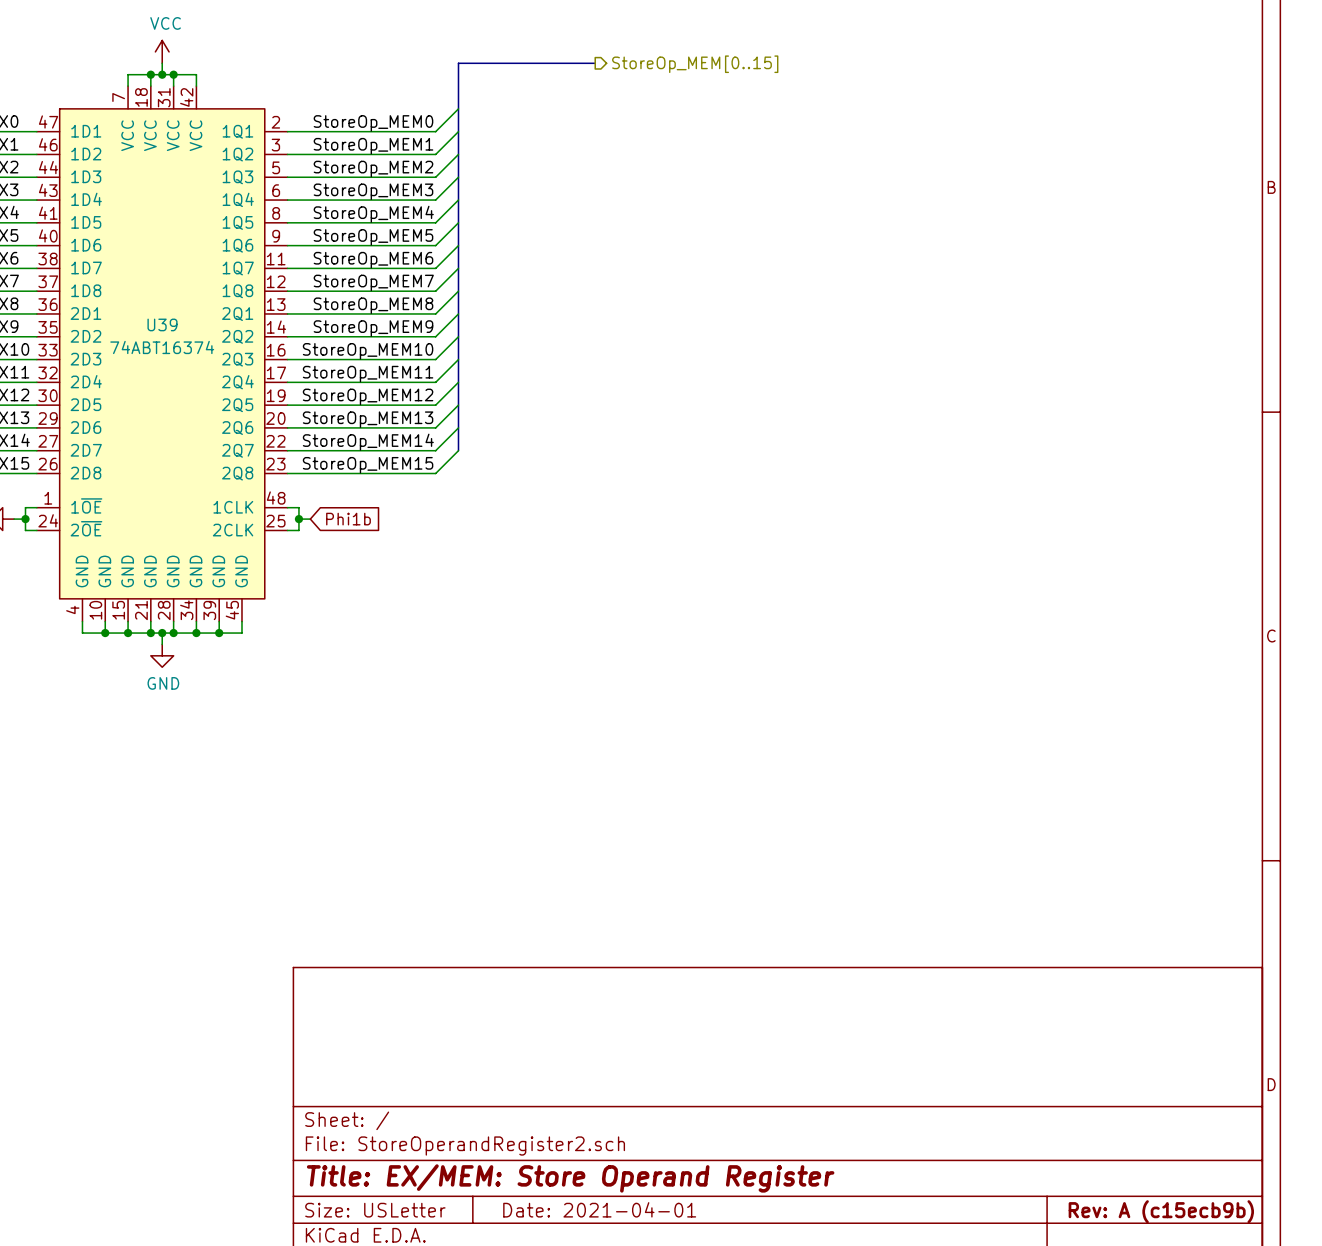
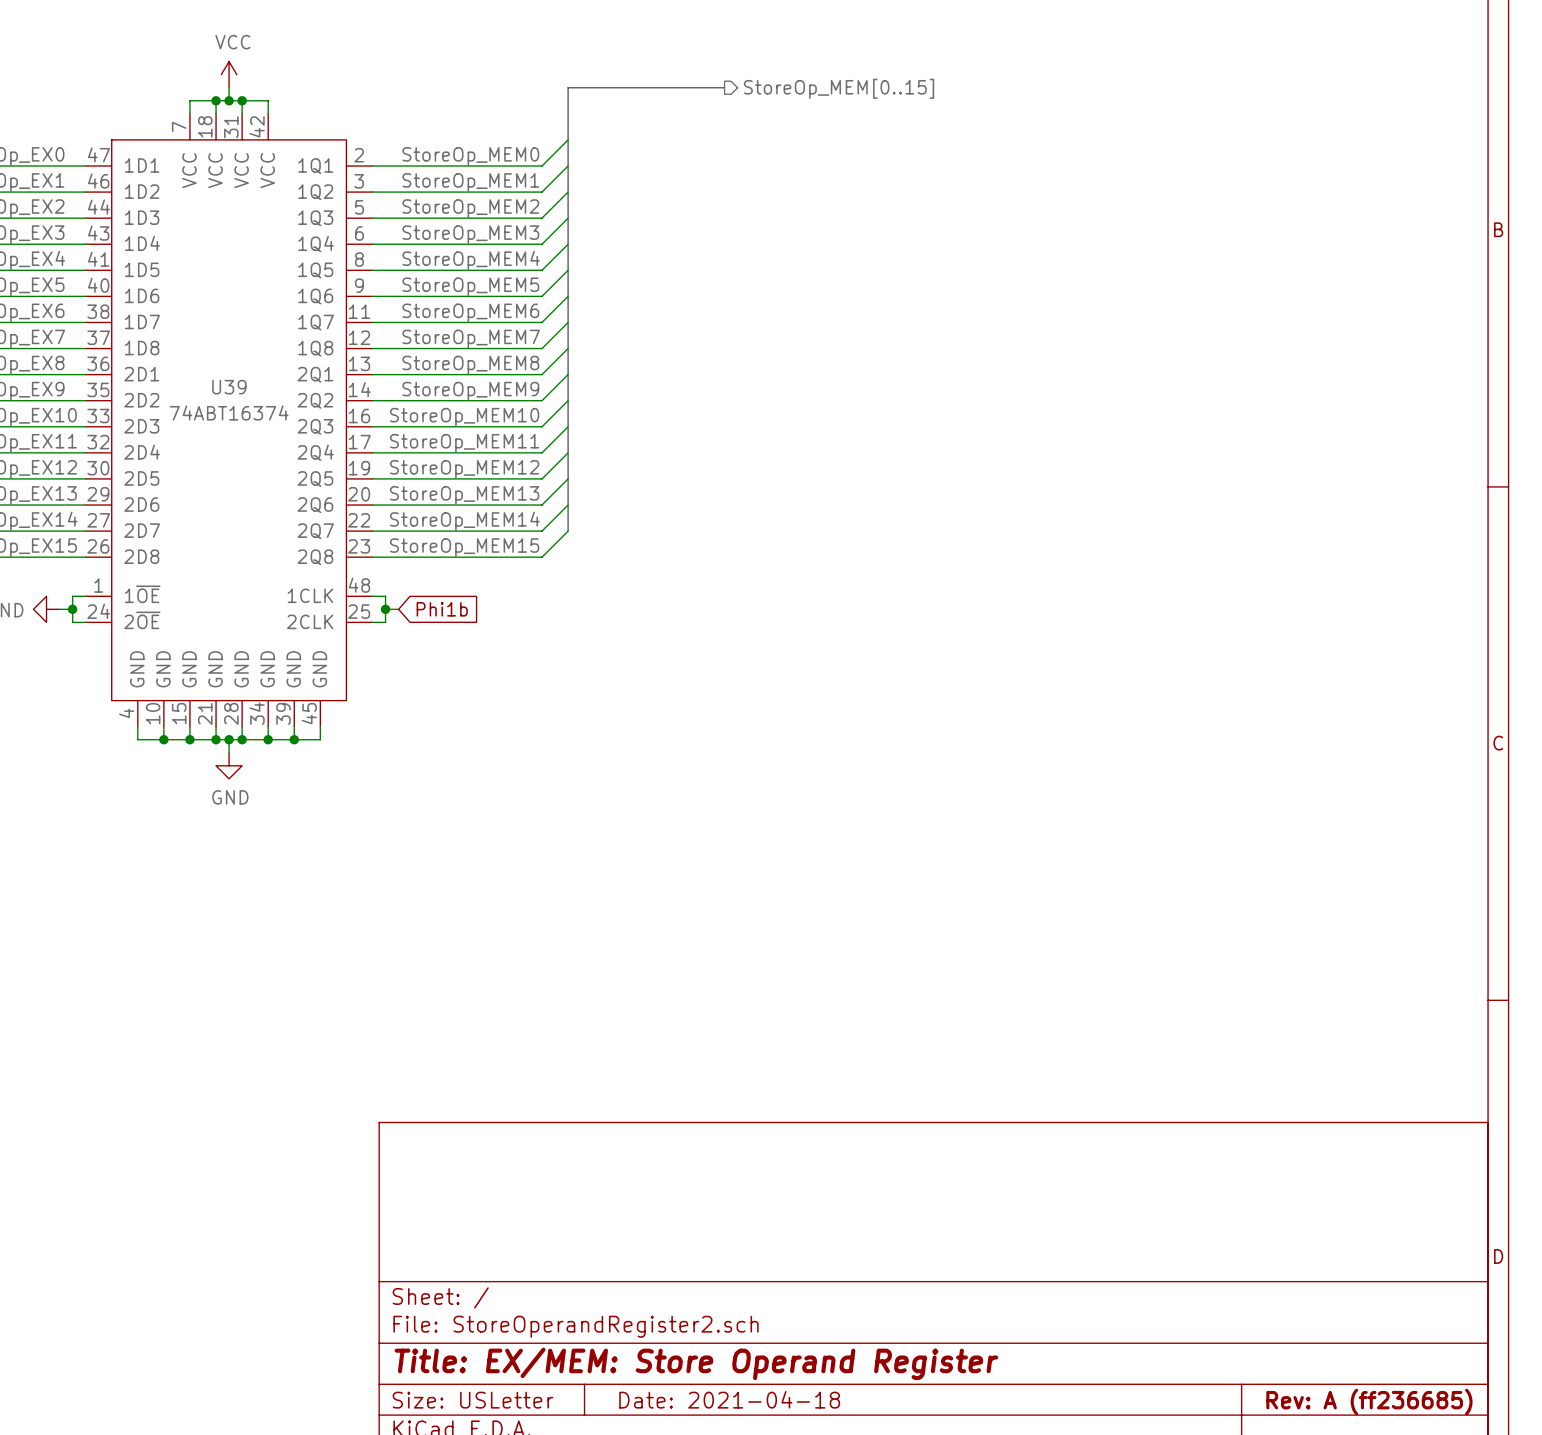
title block: Date: 2021-04-01 (599, 1209) -> Date: 2021-04-18 (729, 1399)
title block: Rev: A (c15ecb9b) (1161, 1211) -> Rev: A (ff236685) (1369, 1401)

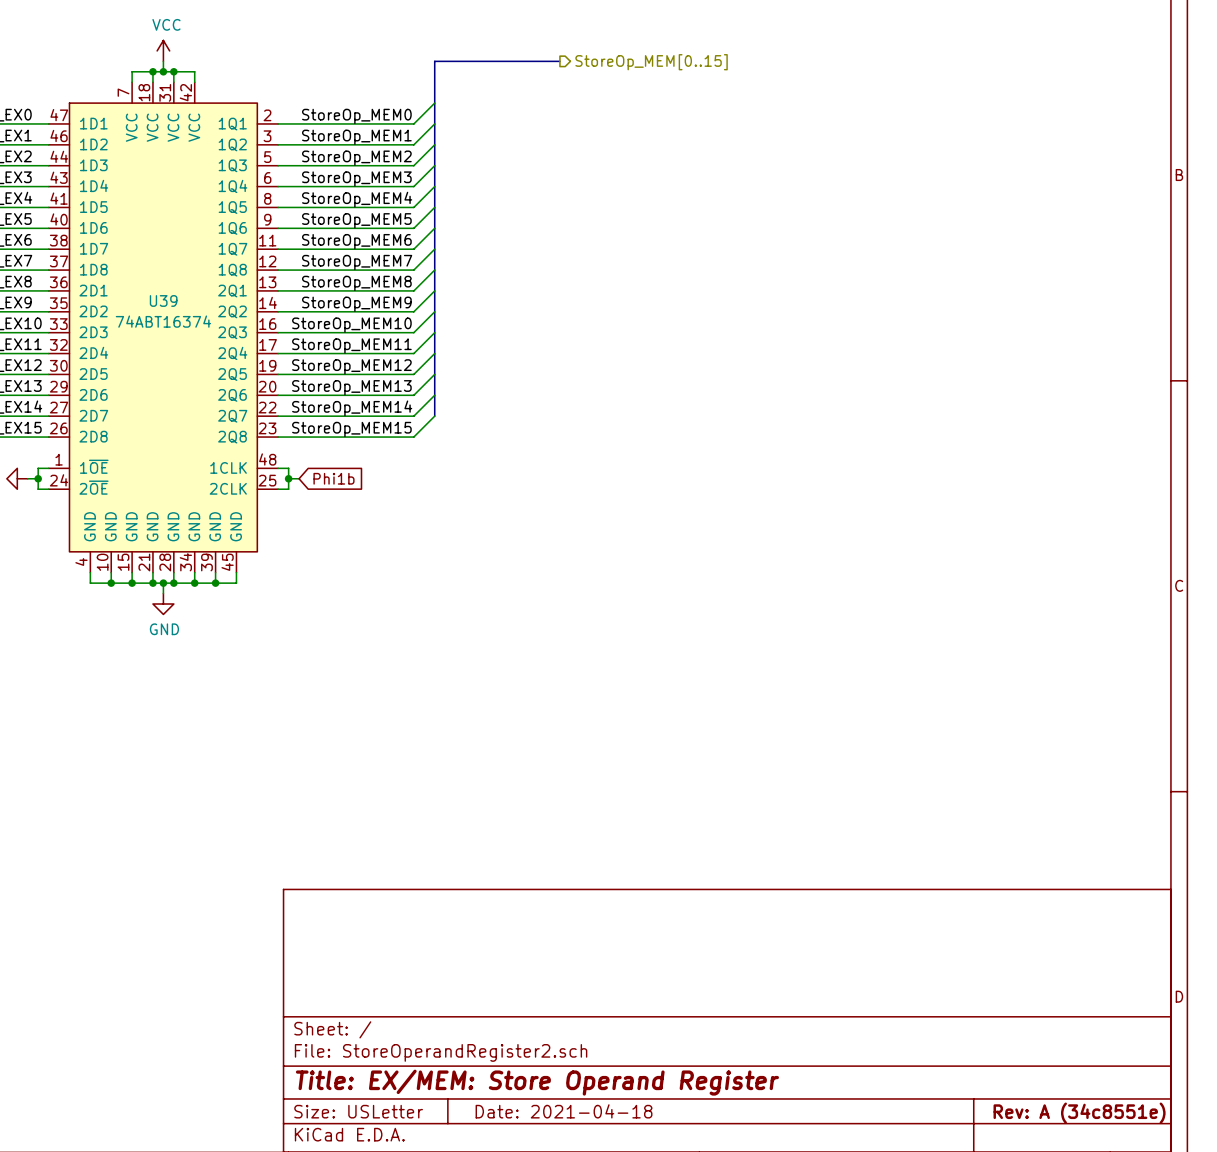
title block: Rev: A (ff236685) (1369, 1401) -> Rev: A (34c8551e) (1079, 1113)

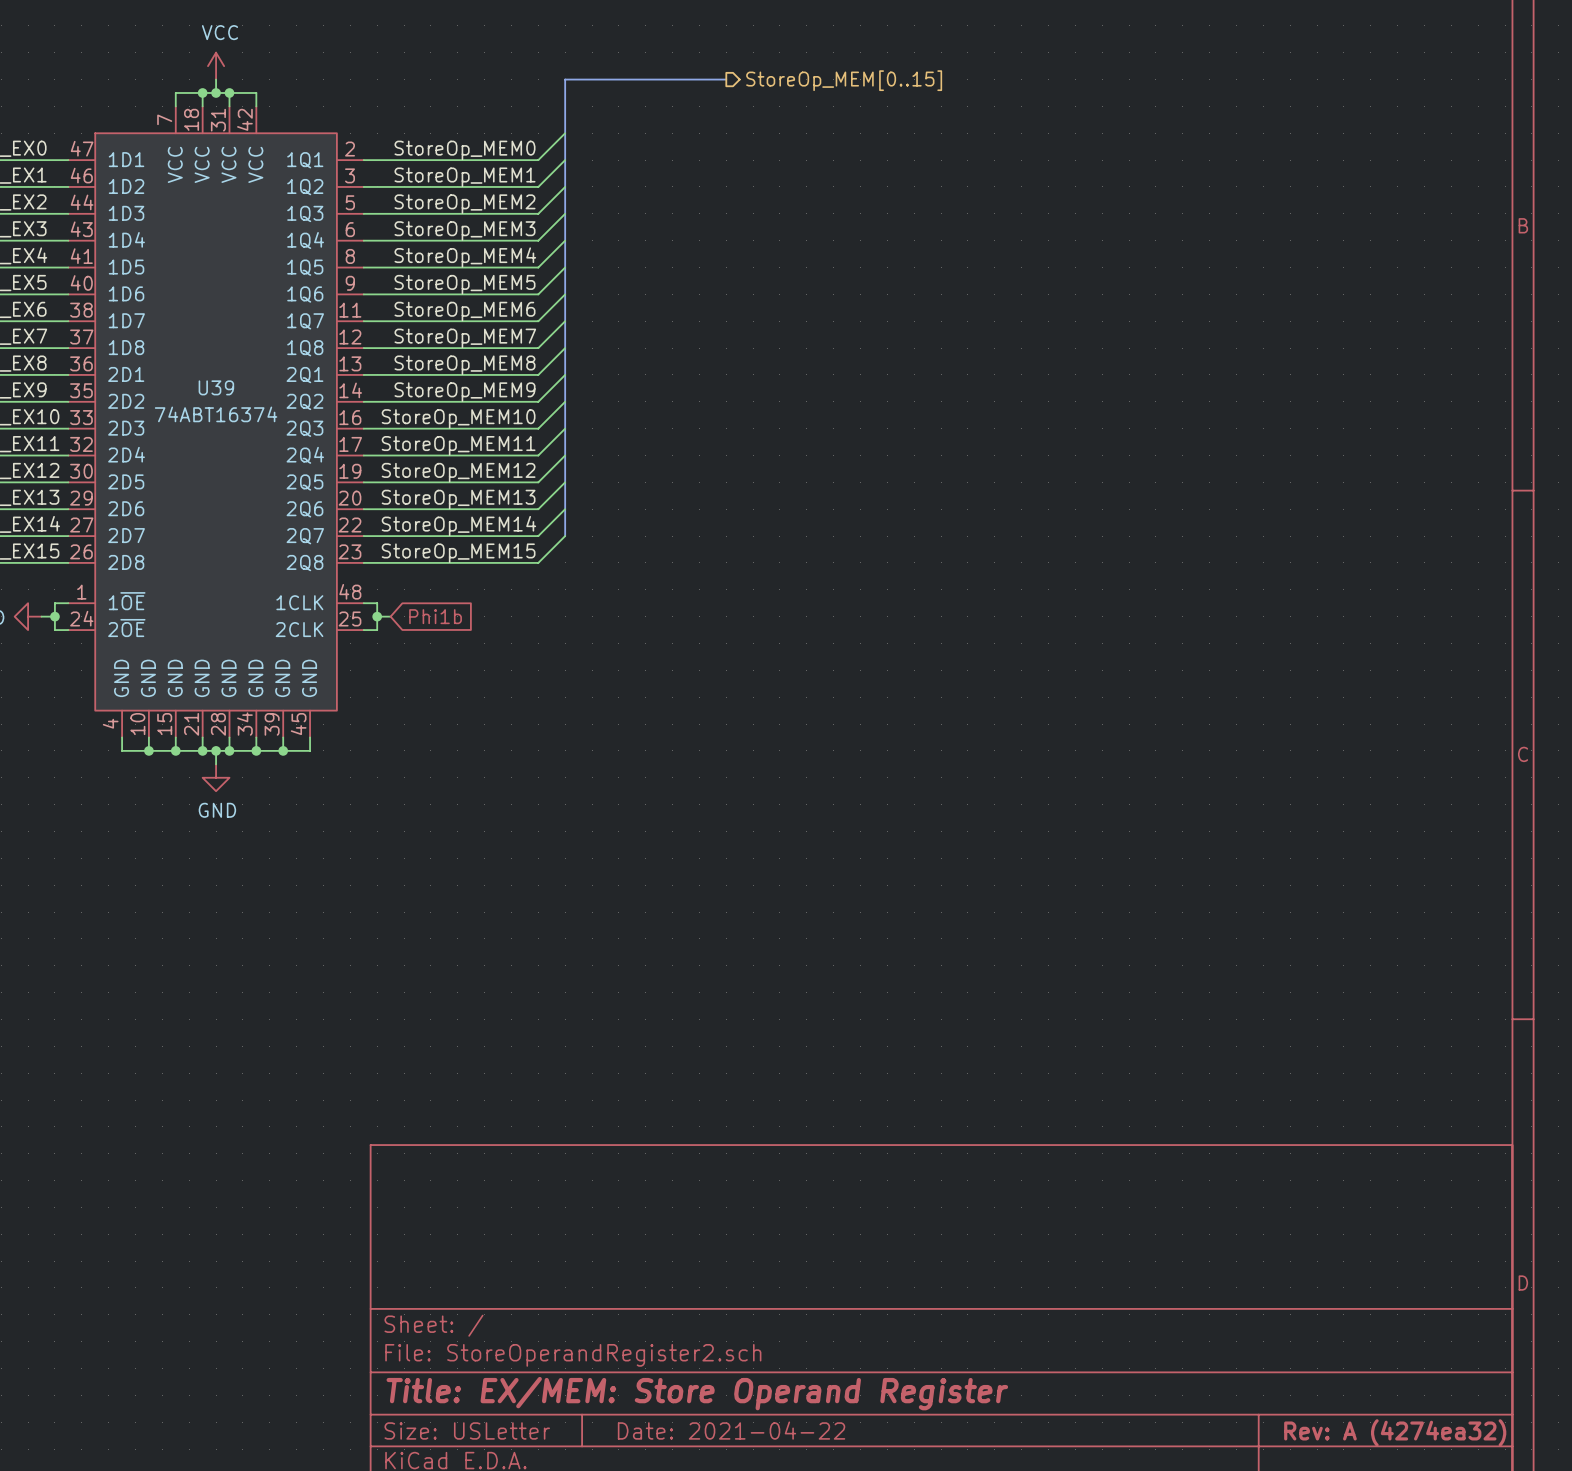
title block: Date: 2021-04-18 (564, 1111) -> Date: 2021-04-22 (731, 1430)
title block: Rev: A (34c8551e) (1079, 1113) -> Rev: A (4274ea32) (1395, 1432)

